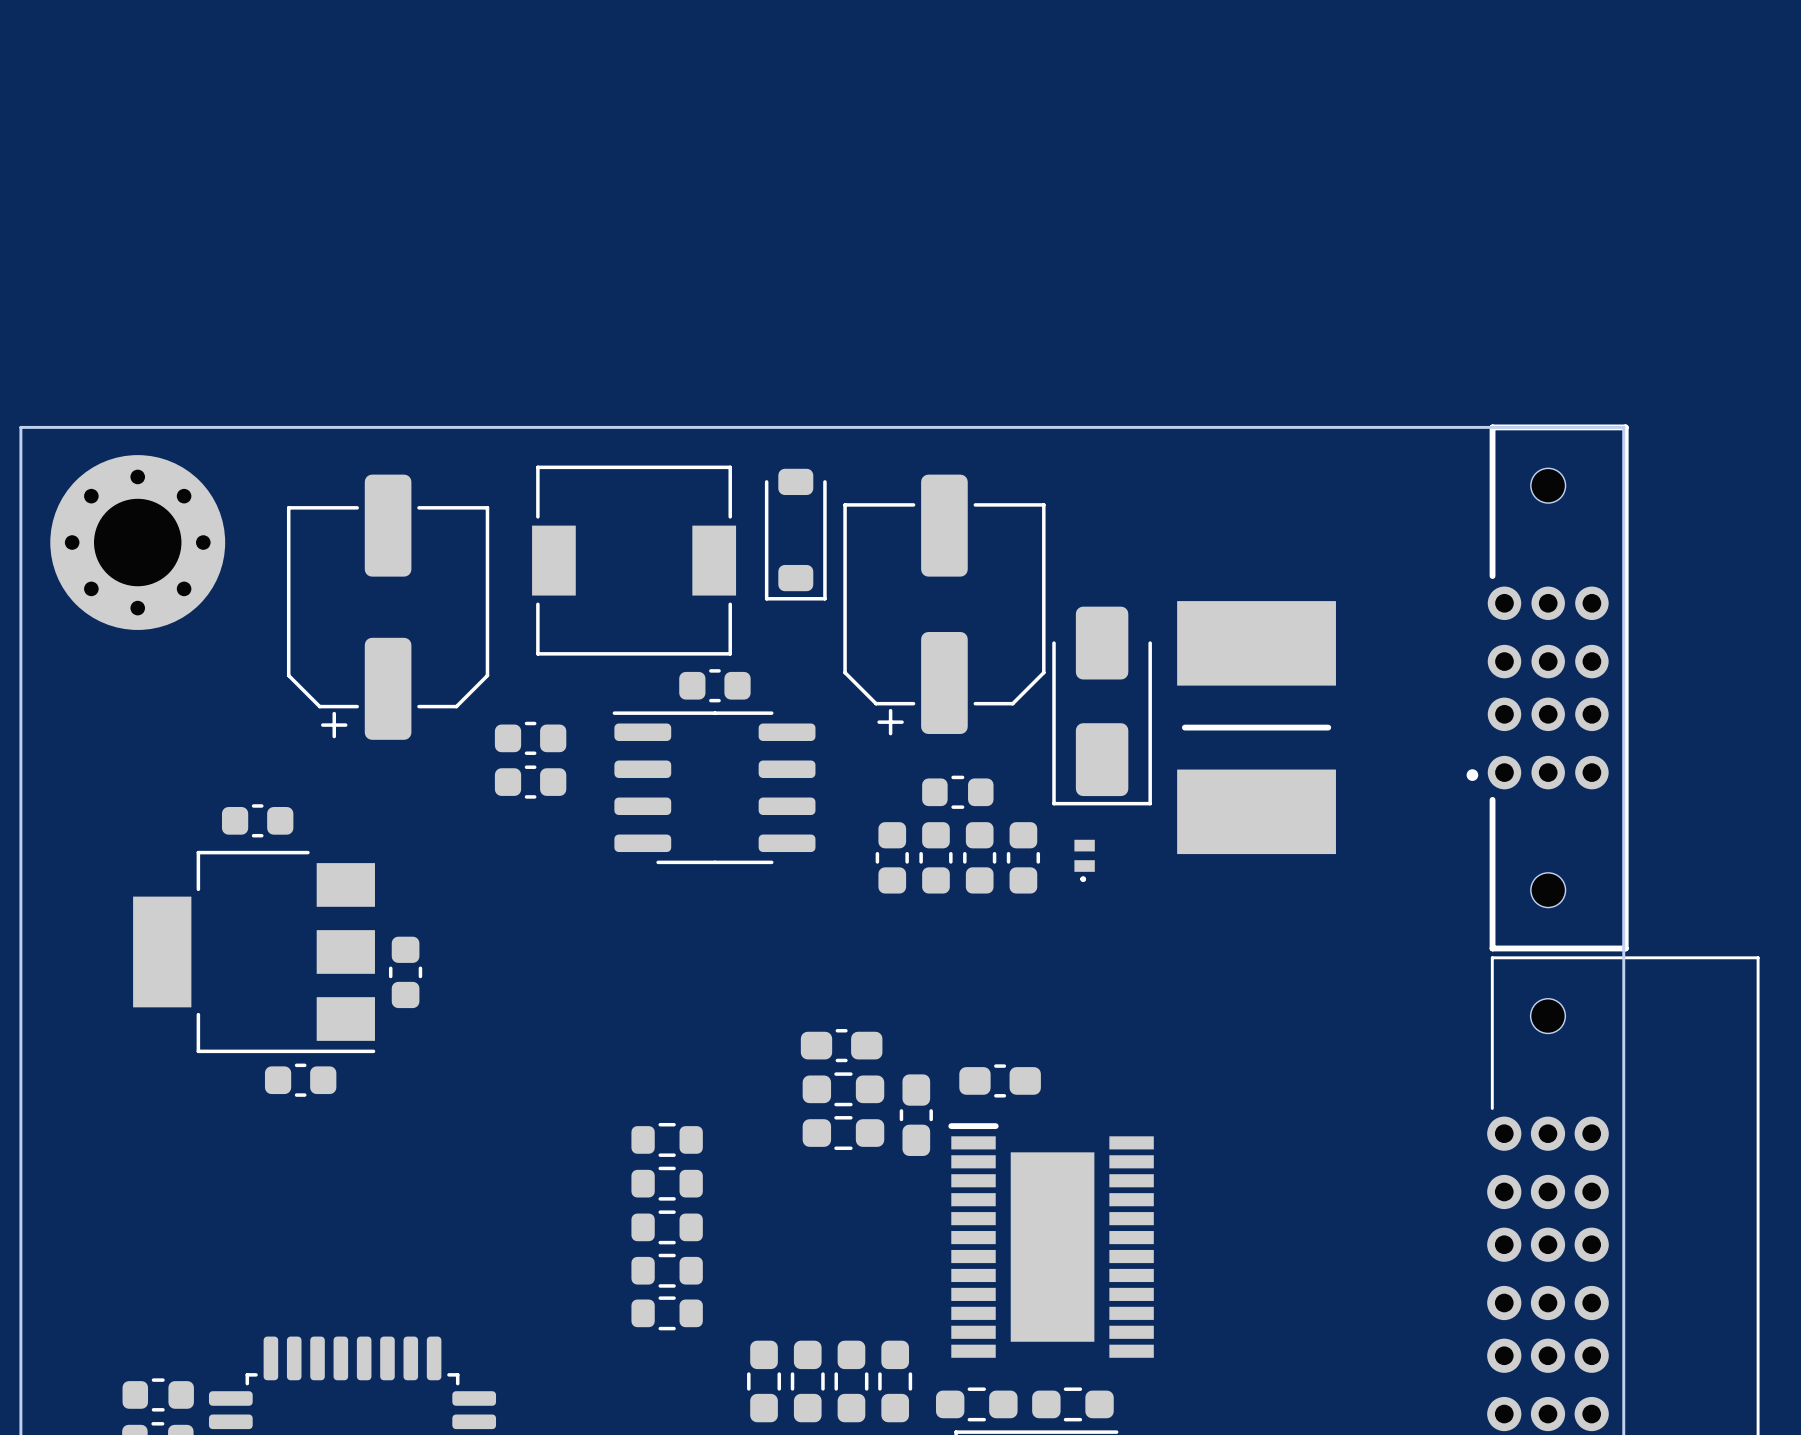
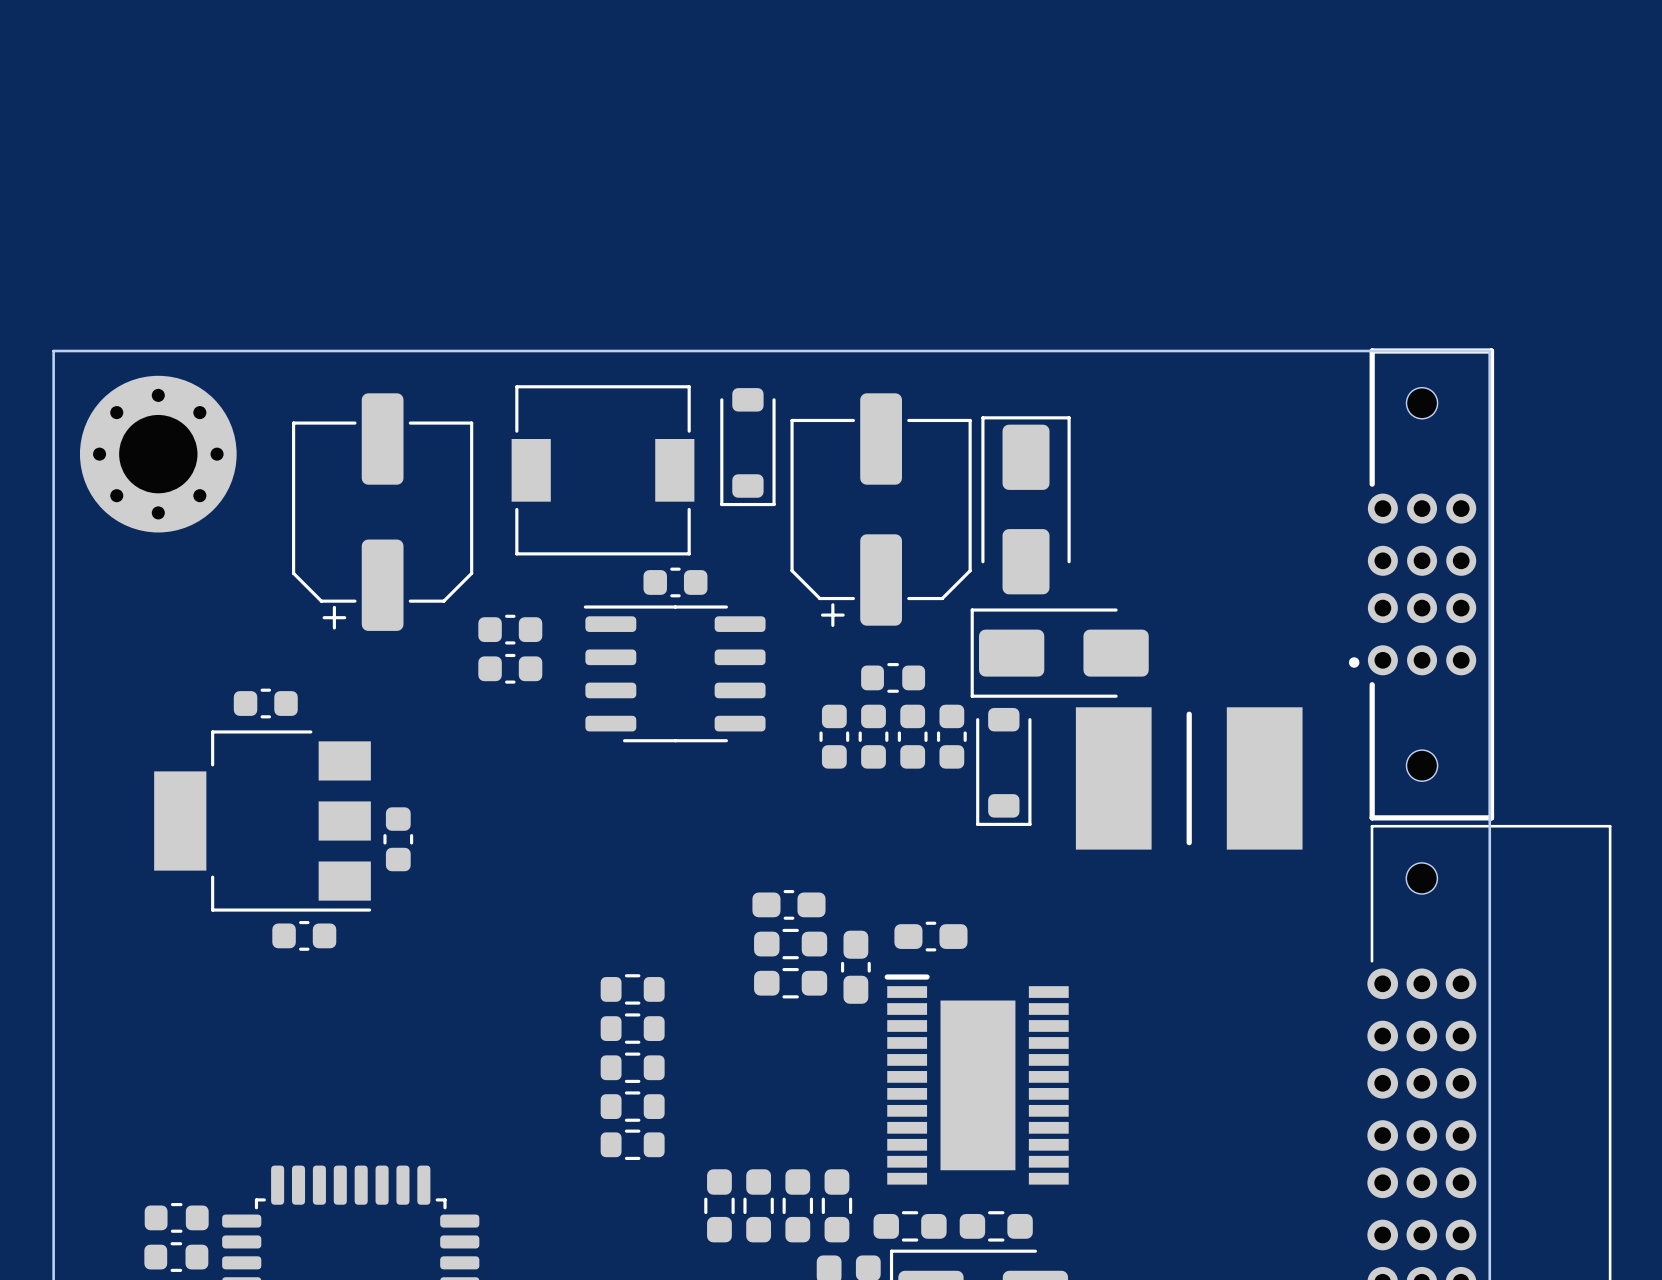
part: none -> (1026, 505)
part: (1102, 706) -> none
part rotation: 0° (1256, 727) -> 90° clockwise (1189, 778)
part position: (1256, 727) -> (1189, 778)
part: none -> (1059, 653)
part: (1084, 860) -> none
part: none -> (1003, 766)

